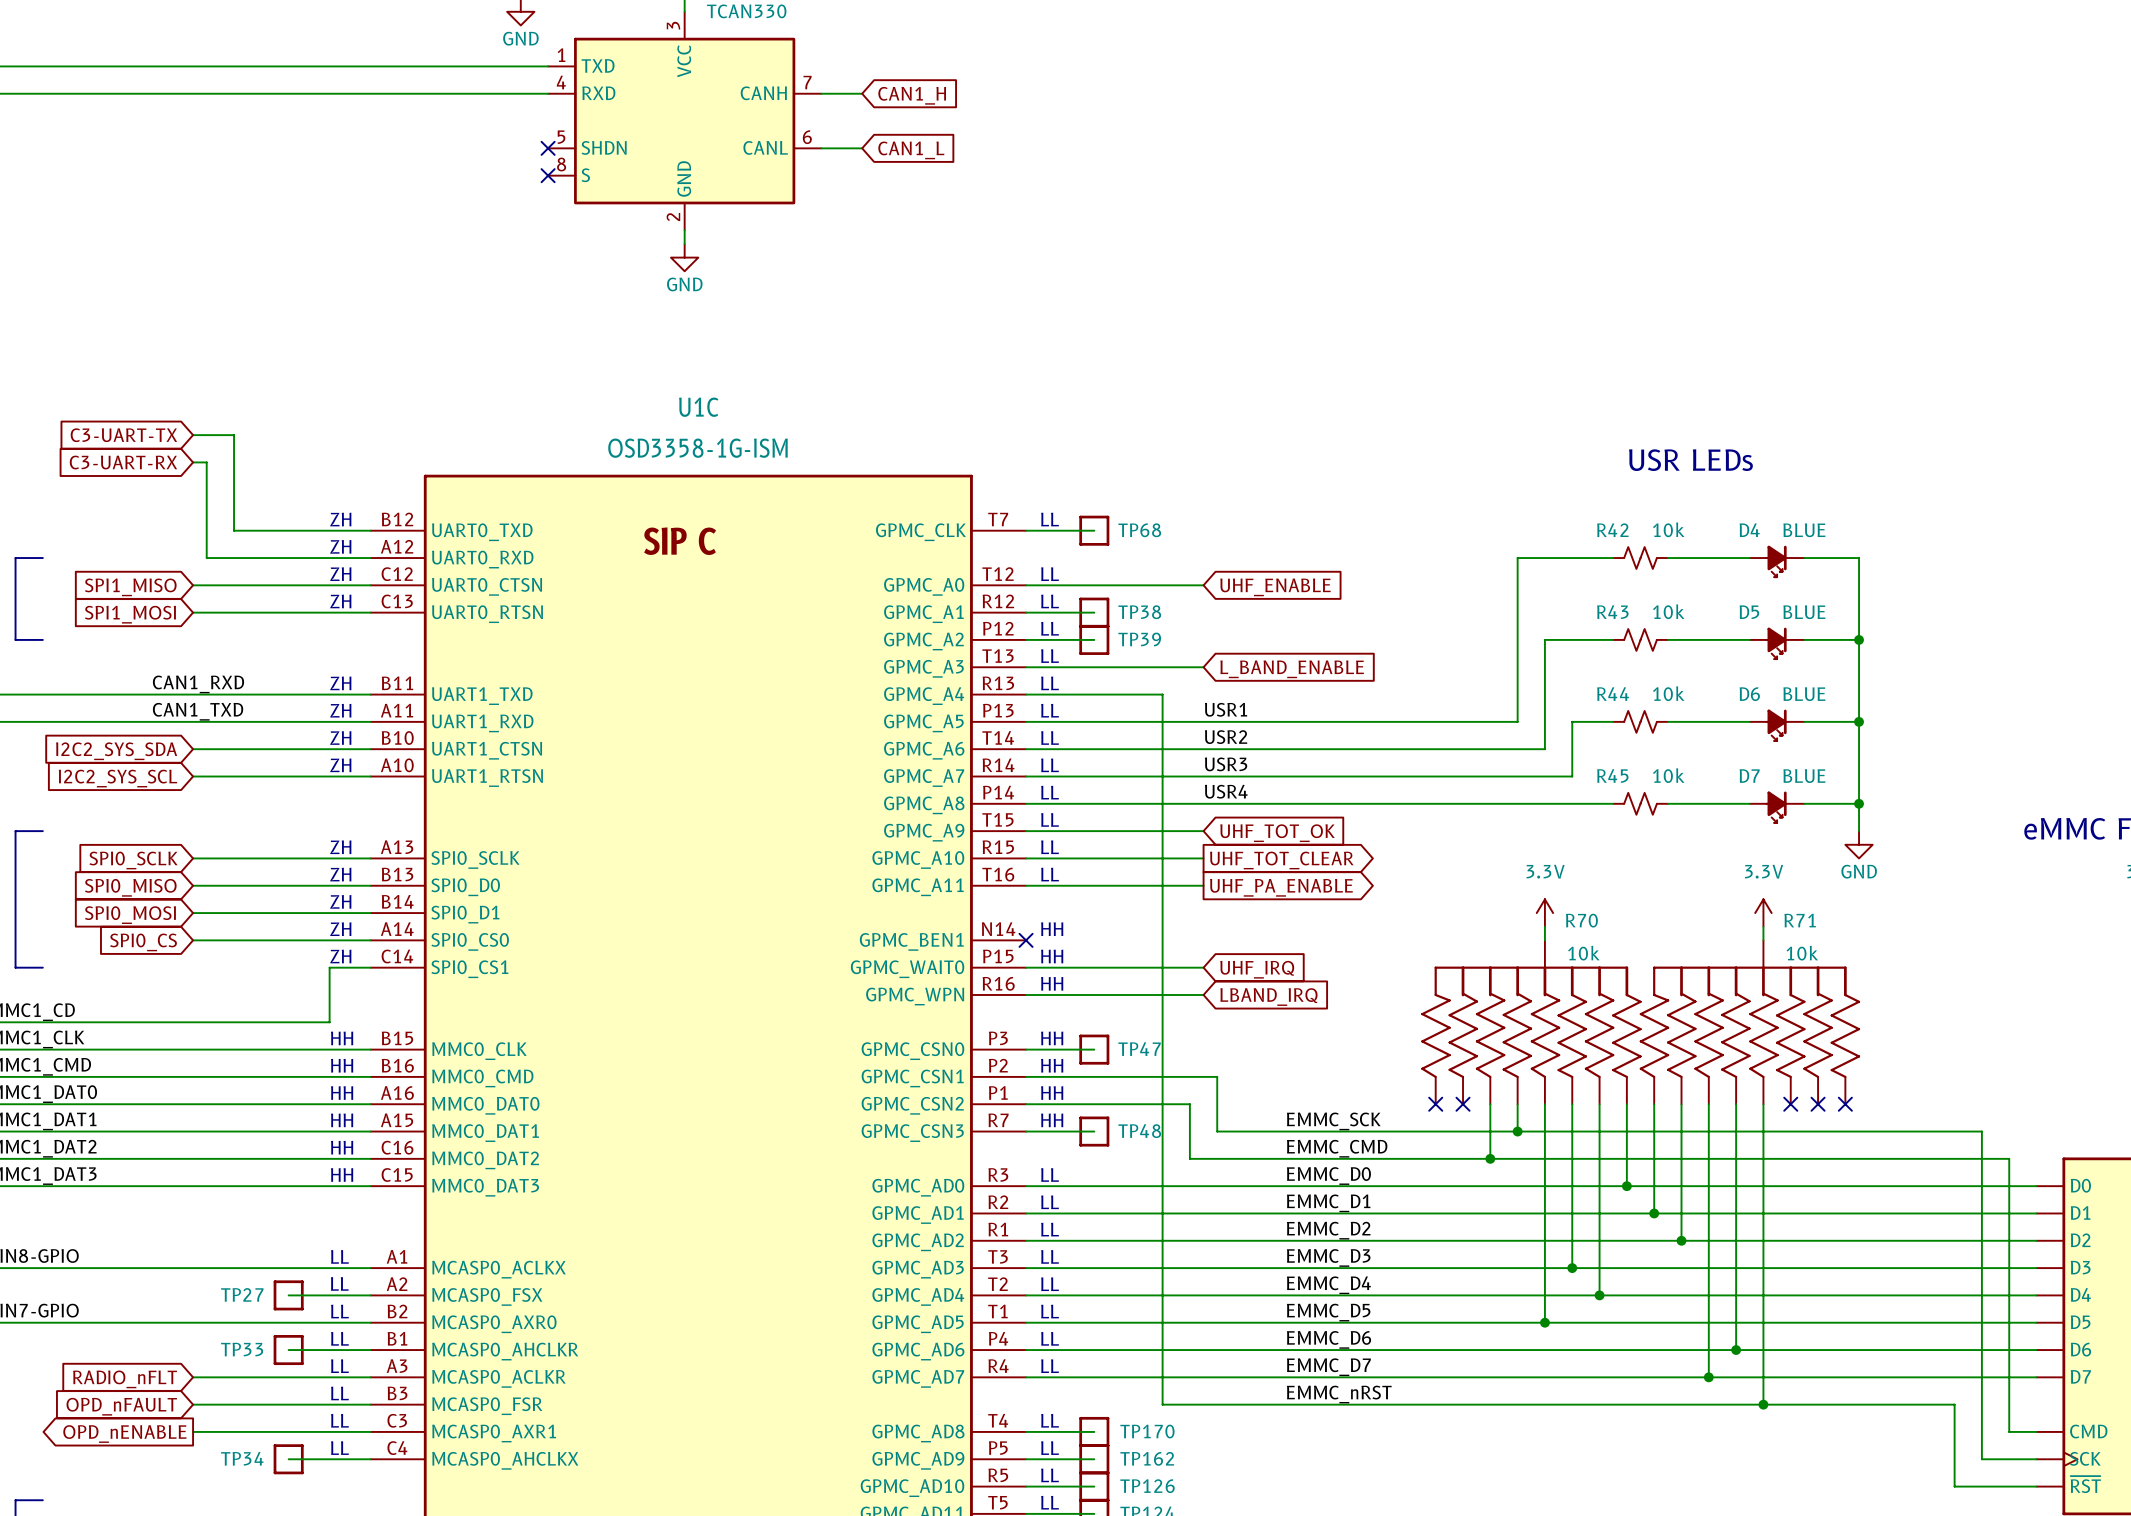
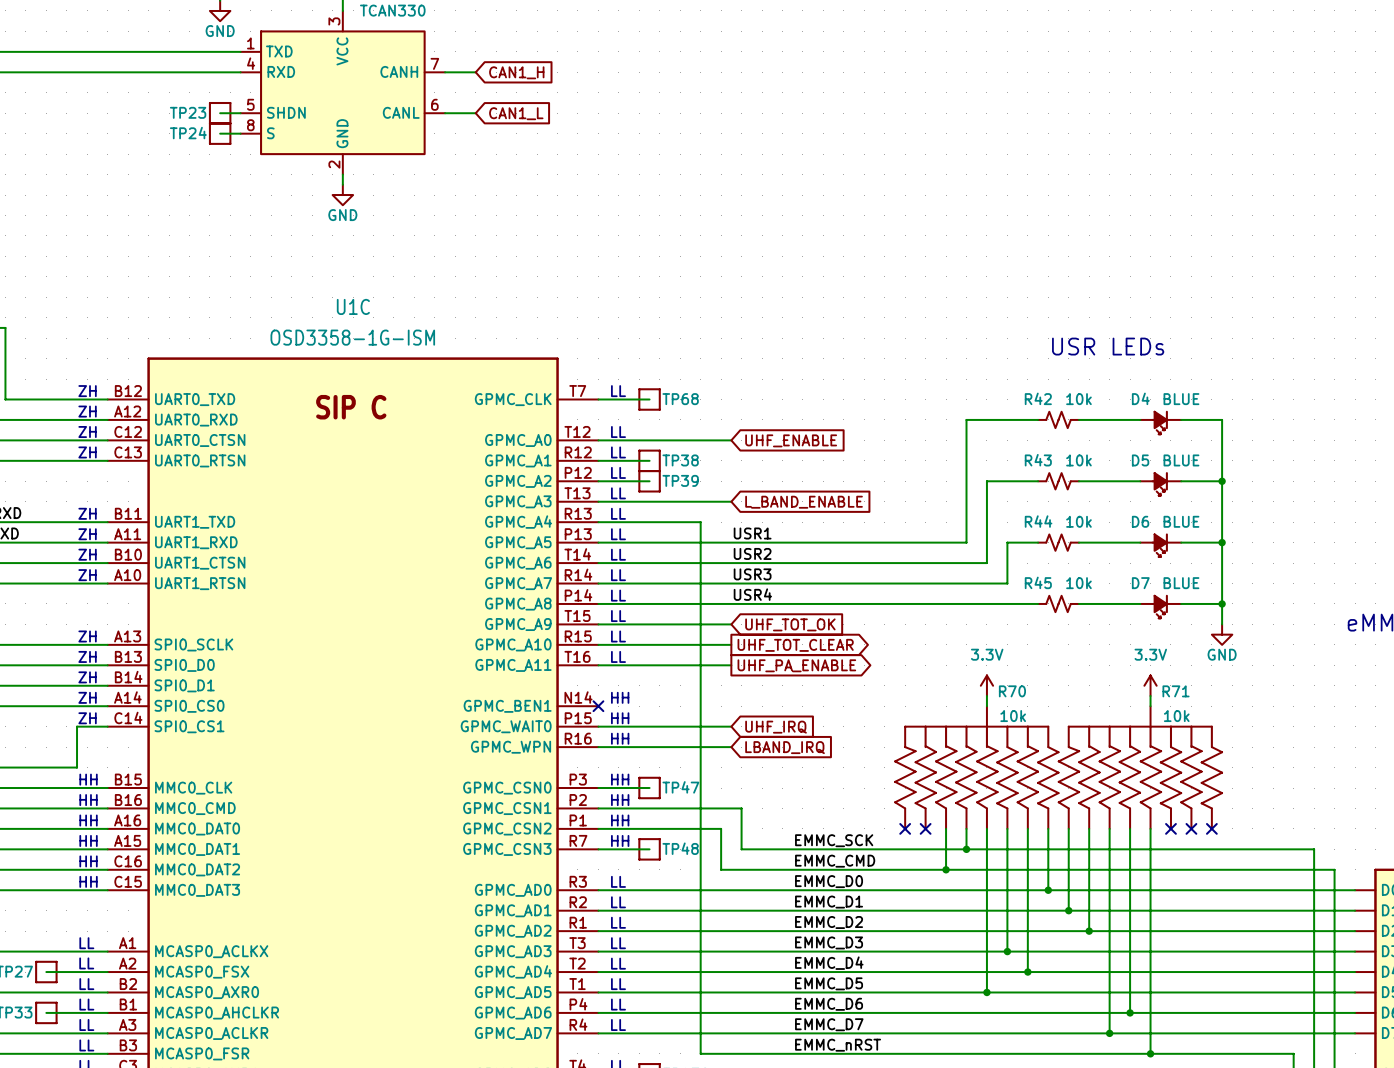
wire: none -> (220, 113) (240, 113)
TP23: none -> (220, 113)
no-connect mark: (548, 148) -> none
wire: none -> (220, 133) (240, 133)
TP24: none -> (220, 133)
no-connect mark: (548, 175) -> none

